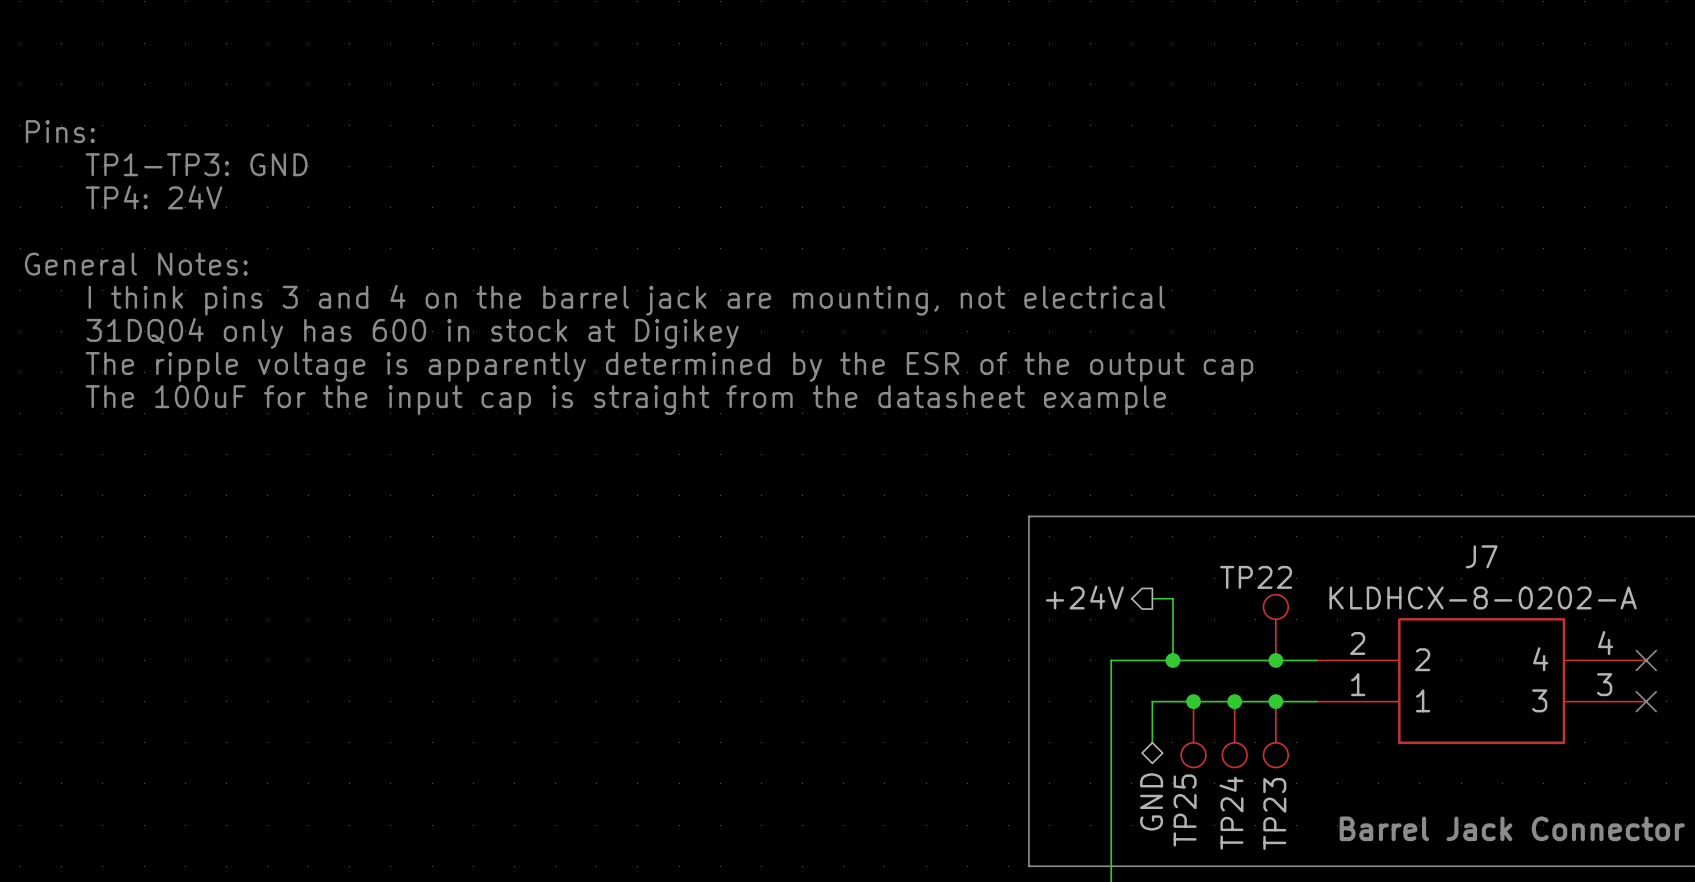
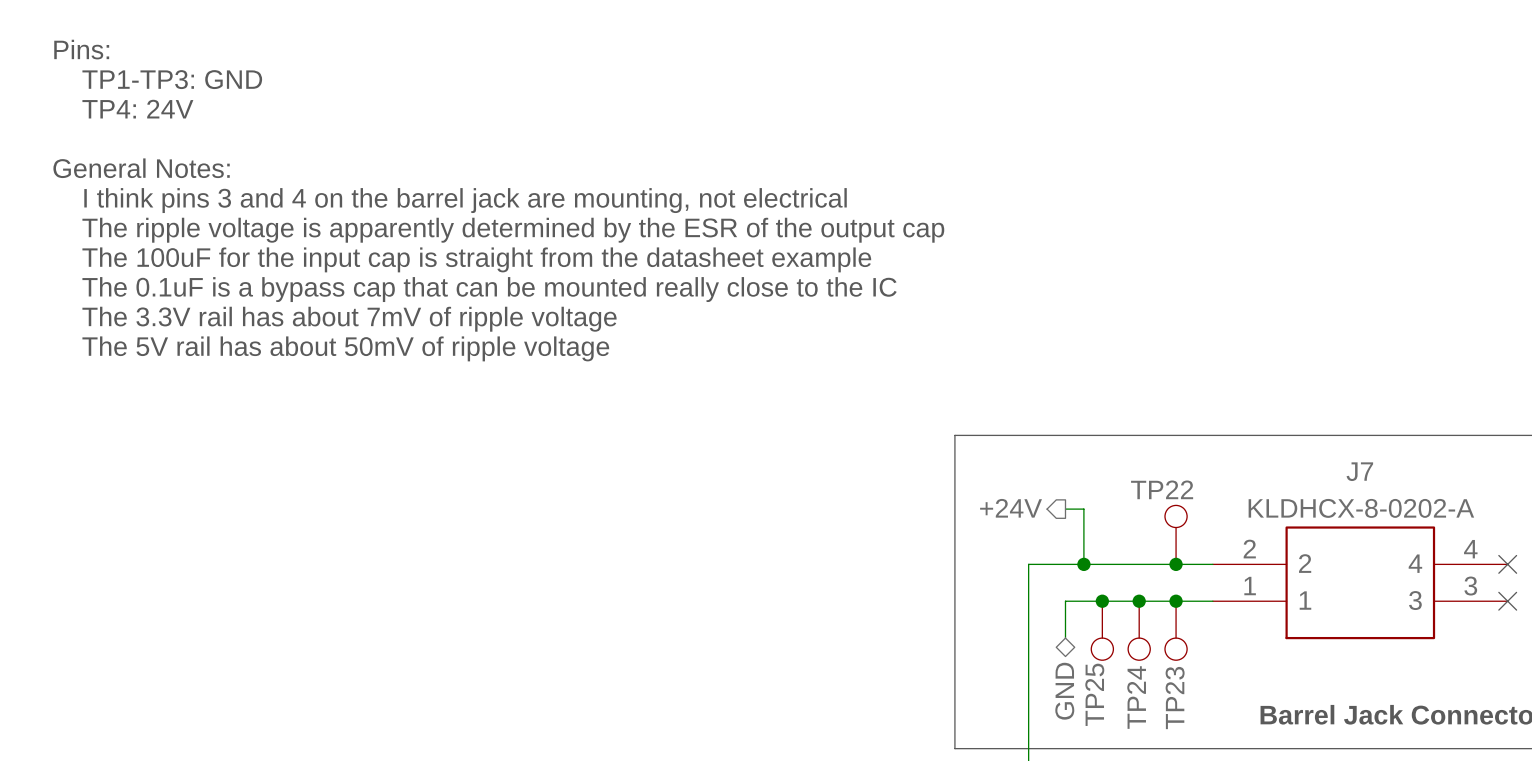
text position: Pins: (60, 131) -> Pins: (81, 49)
text position: TP1-TP3: GND (196, 164) -> TP1-TP3: GND (172, 79)
text position: TP4: 24V (153, 197) -> TP4: 24V (137, 109)
text position: General Notes: (136, 264) -> General Notes: (141, 168)
text position: I think pins 3 and 4 on the barrel jack are mounting, not electrical (626, 300) -> I think pins 3 and 4 on the barrel jack are mounting, not electrical (465, 200)
text: 31DQ04 only has 600 in stock at Digikey (412, 333) -> none
text: none -> The 0.1uF is a bypass cap that can be mounted really close to the IC (489, 289)
text position: The ripple voltage is apparently determined by the ESR of the output cap (669, 366) -> The ripple voltage is apparently determined by the ESR of the output cap (513, 230)
text: none -> The 3.3V rail has about 7mV of ripple voltage (349, 319)
text position: The 100uF for the input cap is straight from the datasheet example (625, 400) -> The 100uF for the input cap is straight from the datasheet example (476, 259)
text: none -> The 5V rail has about 50mV of ripple voltage (345, 348)

